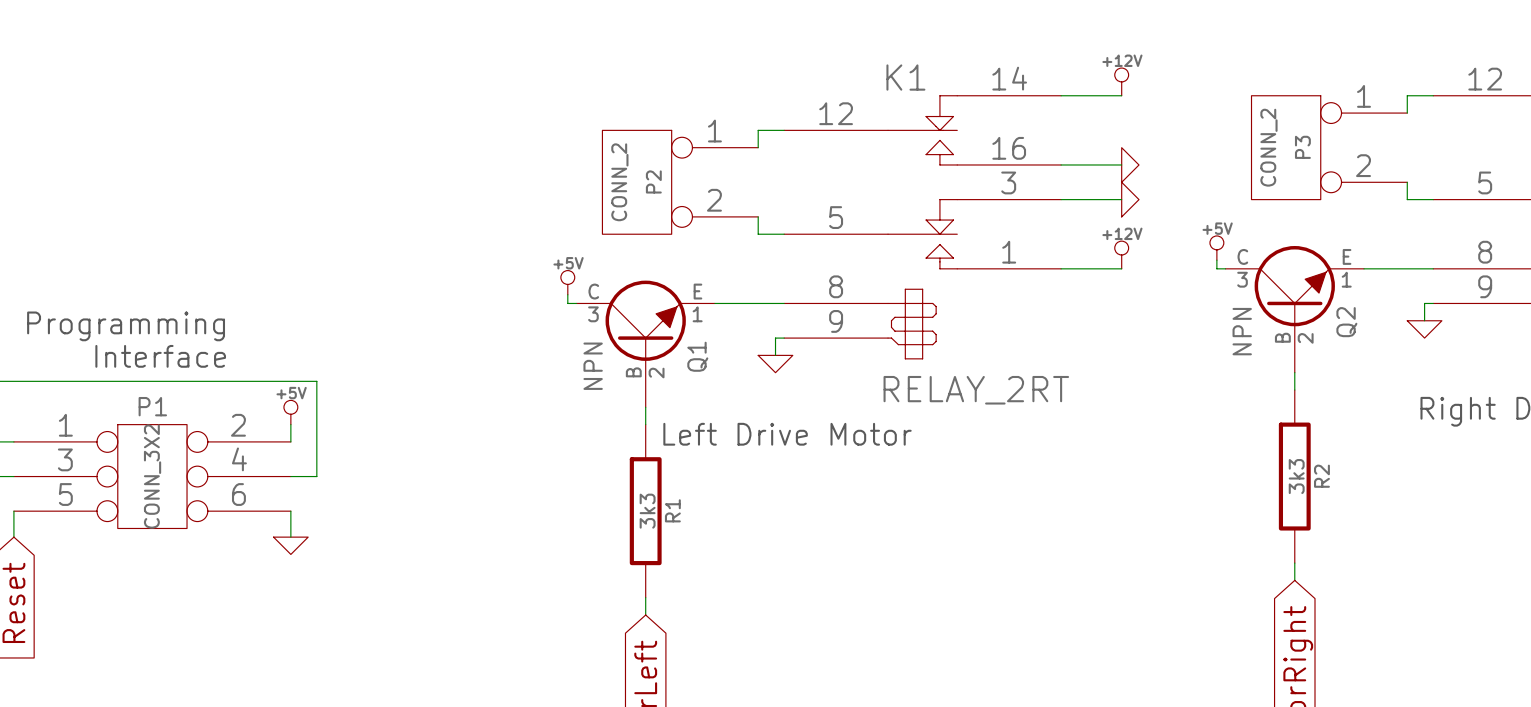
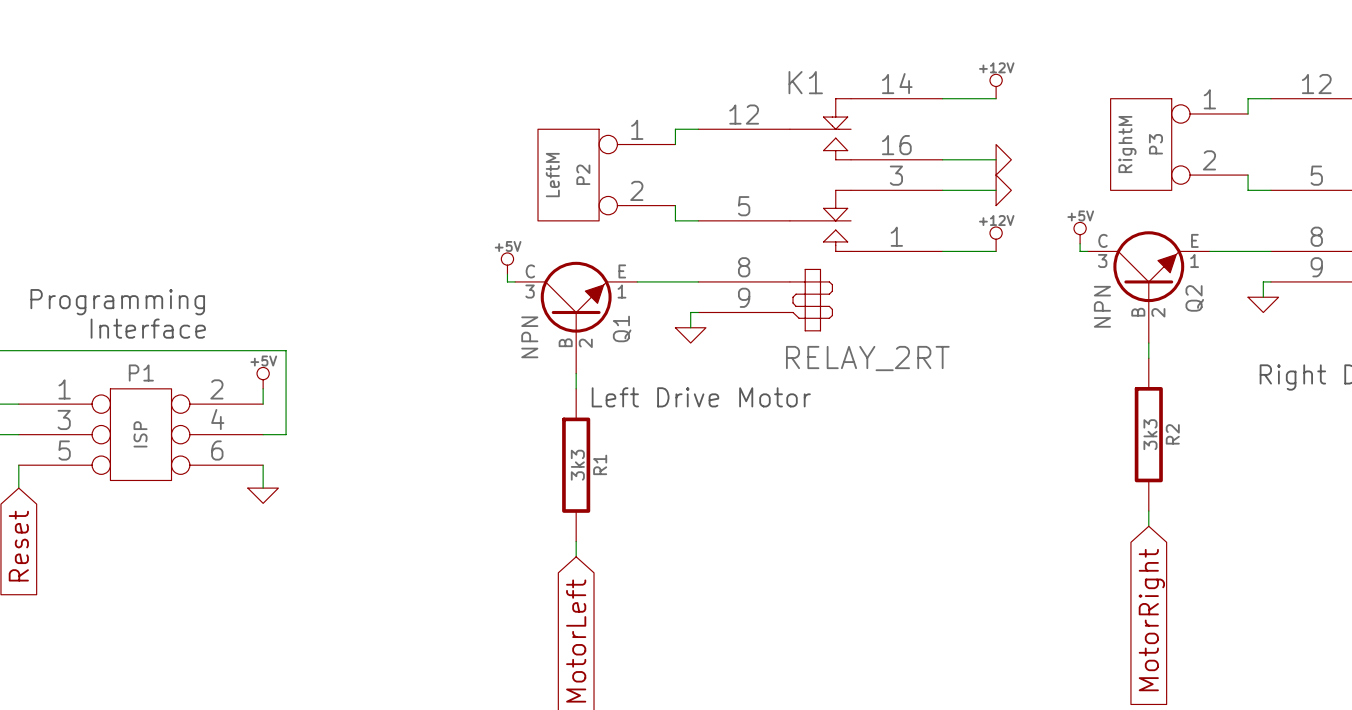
P3 value: CONN_2 (1268, 147) -> RightM (1127, 144)
P2 value: CONN_2 (619, 182) -> LeftM (552, 175)
P1 value: CONN_3X2 (152, 476) -> ISP (140, 434)

